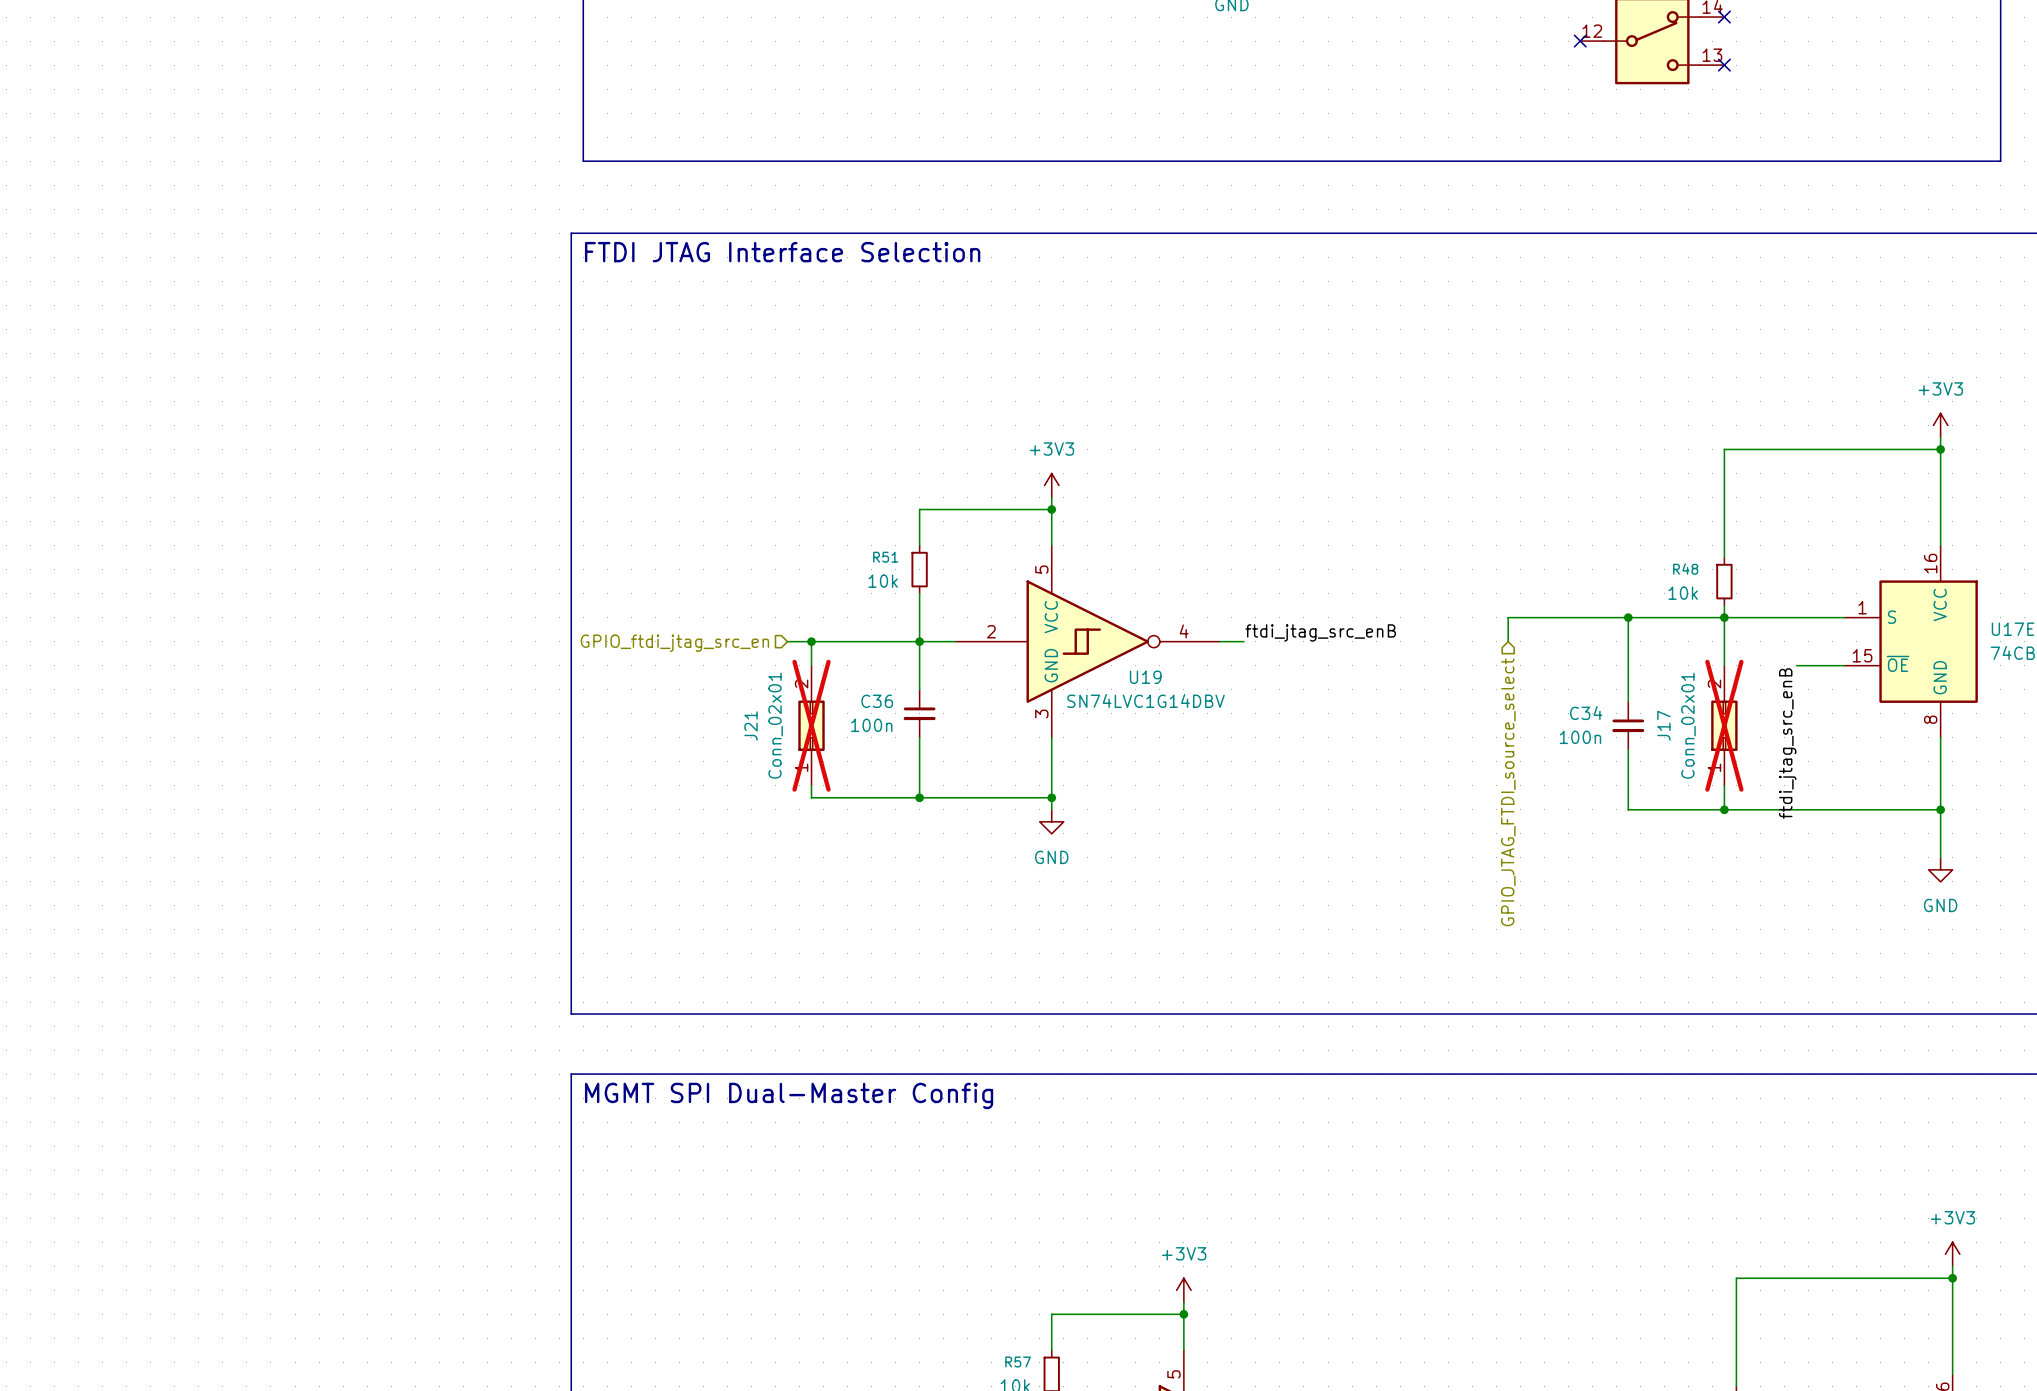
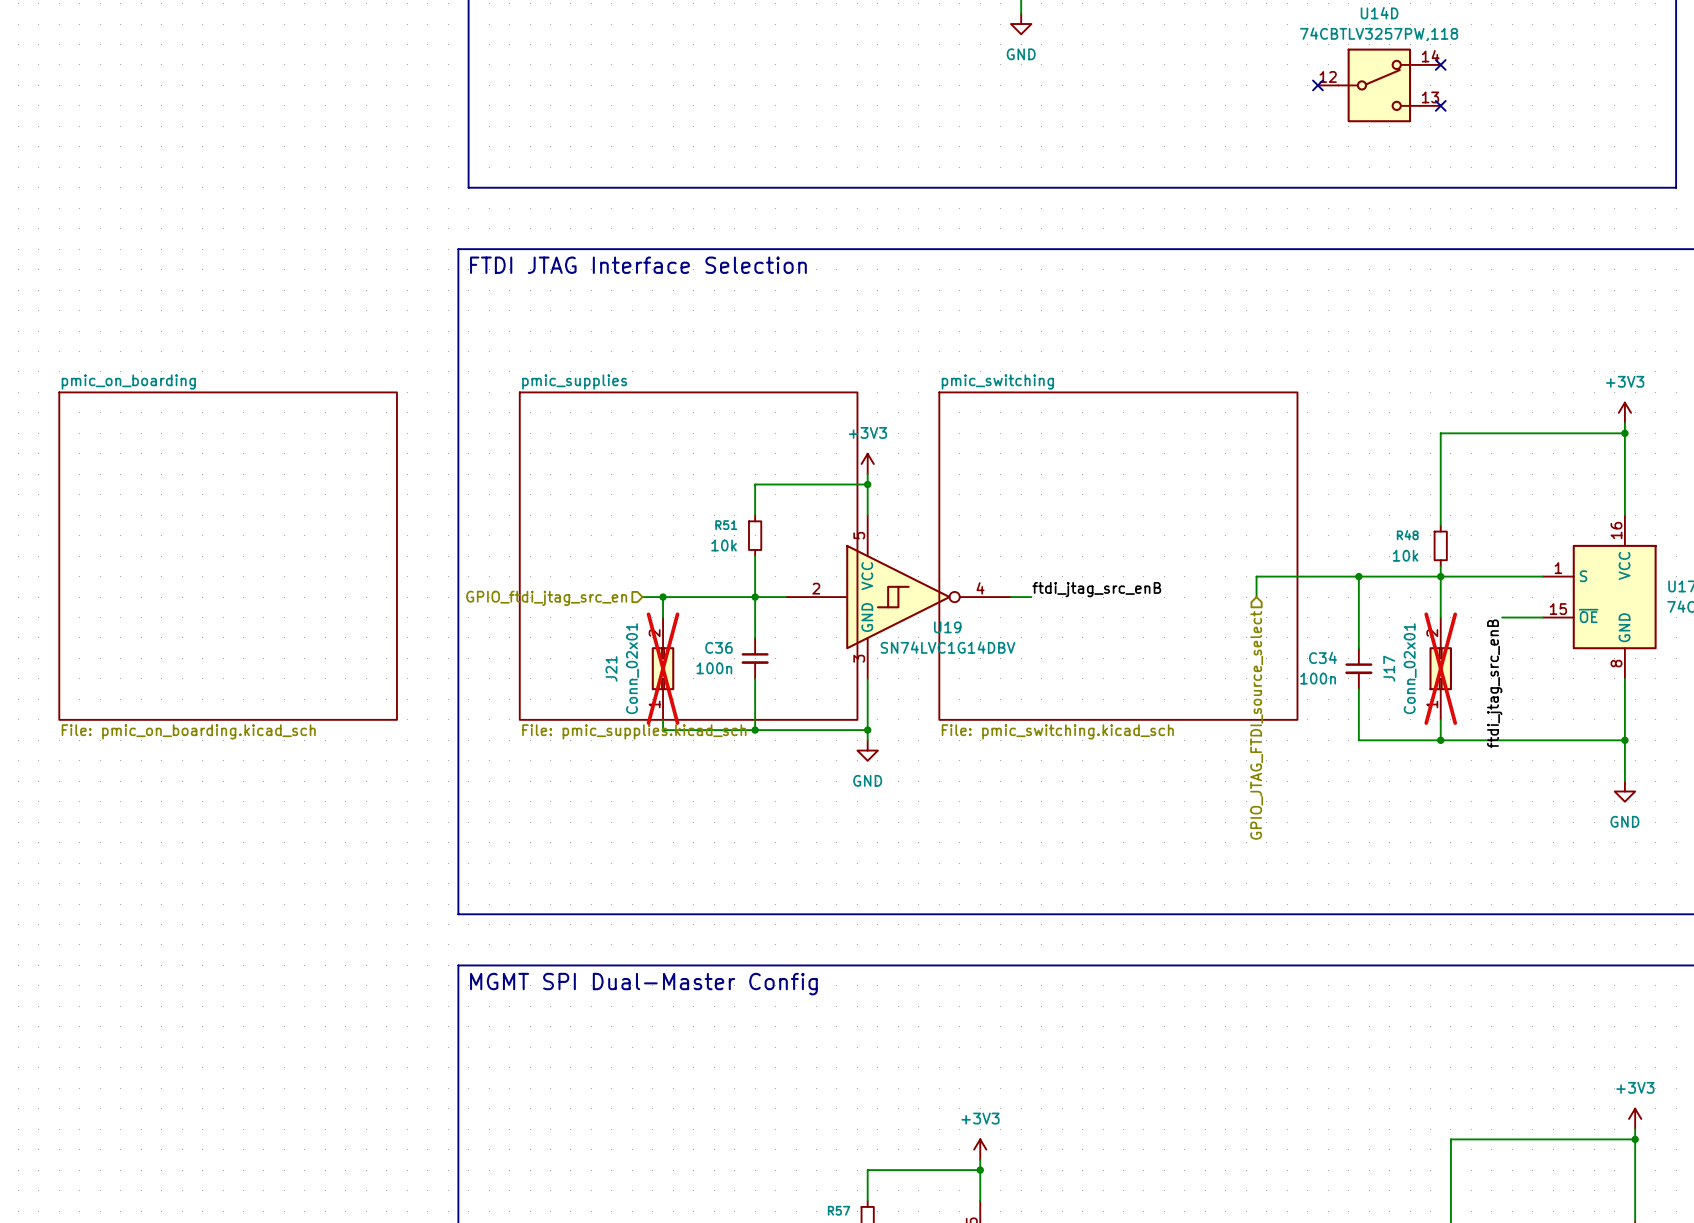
sheet pmic_on_boarding: none -> File: pmic_on_boarding.kicad_sch (228, 556)
sheet pmic_supplies: none -> File: pmic_supplies.kicad_sch (688, 556)
sheet pmic_switching: none -> File: pmic_switching.kicad_sch (1118, 556)

